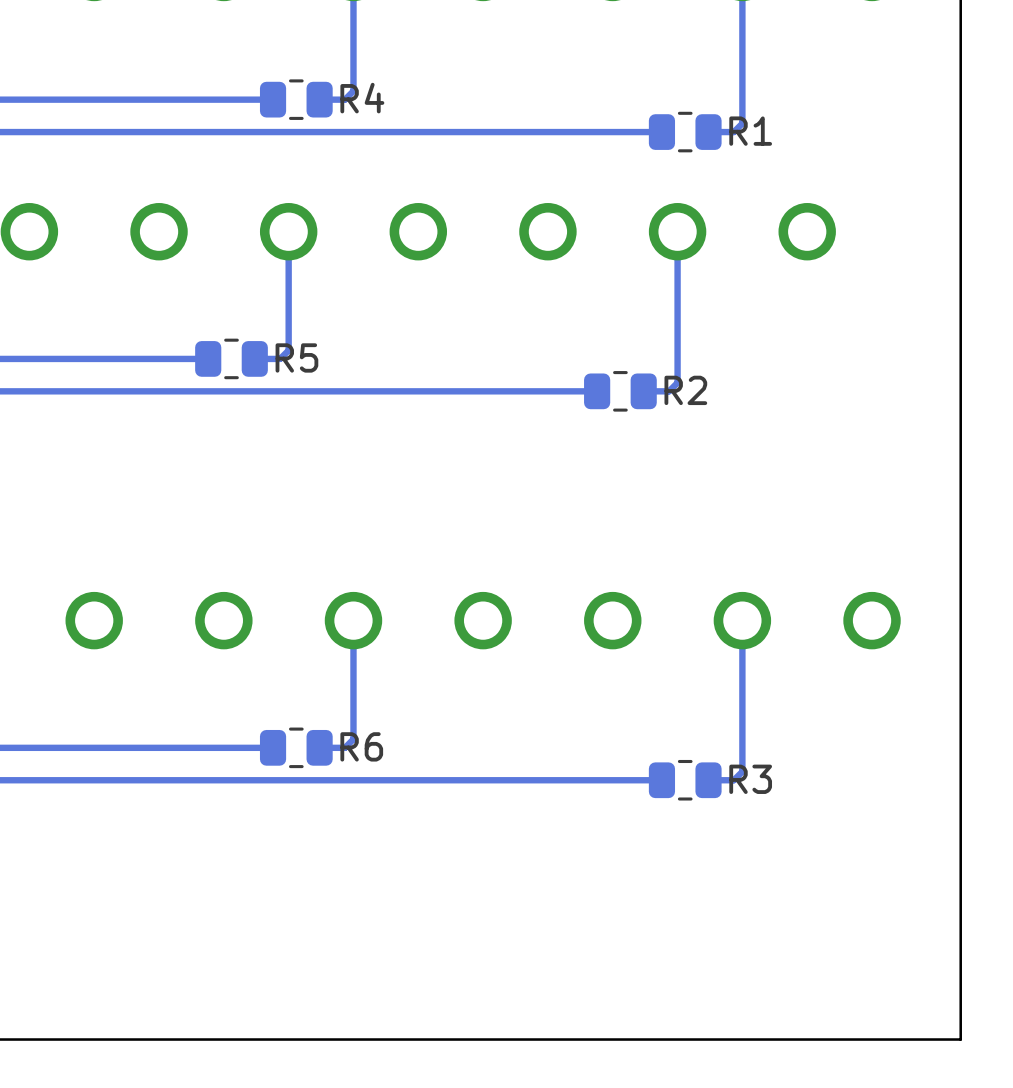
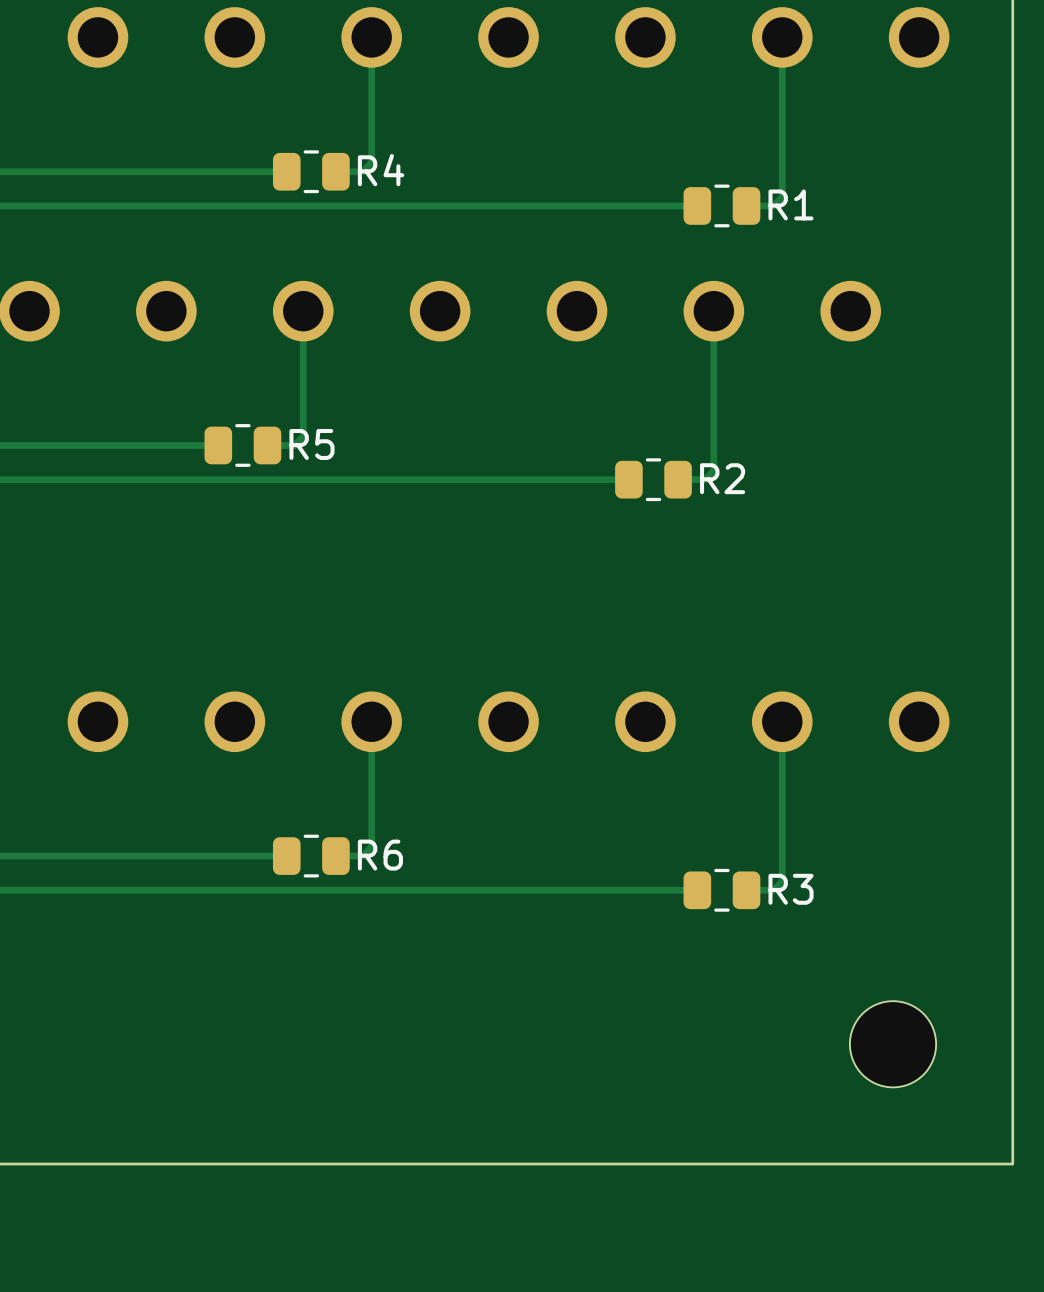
part: none -> (893, 1044)

